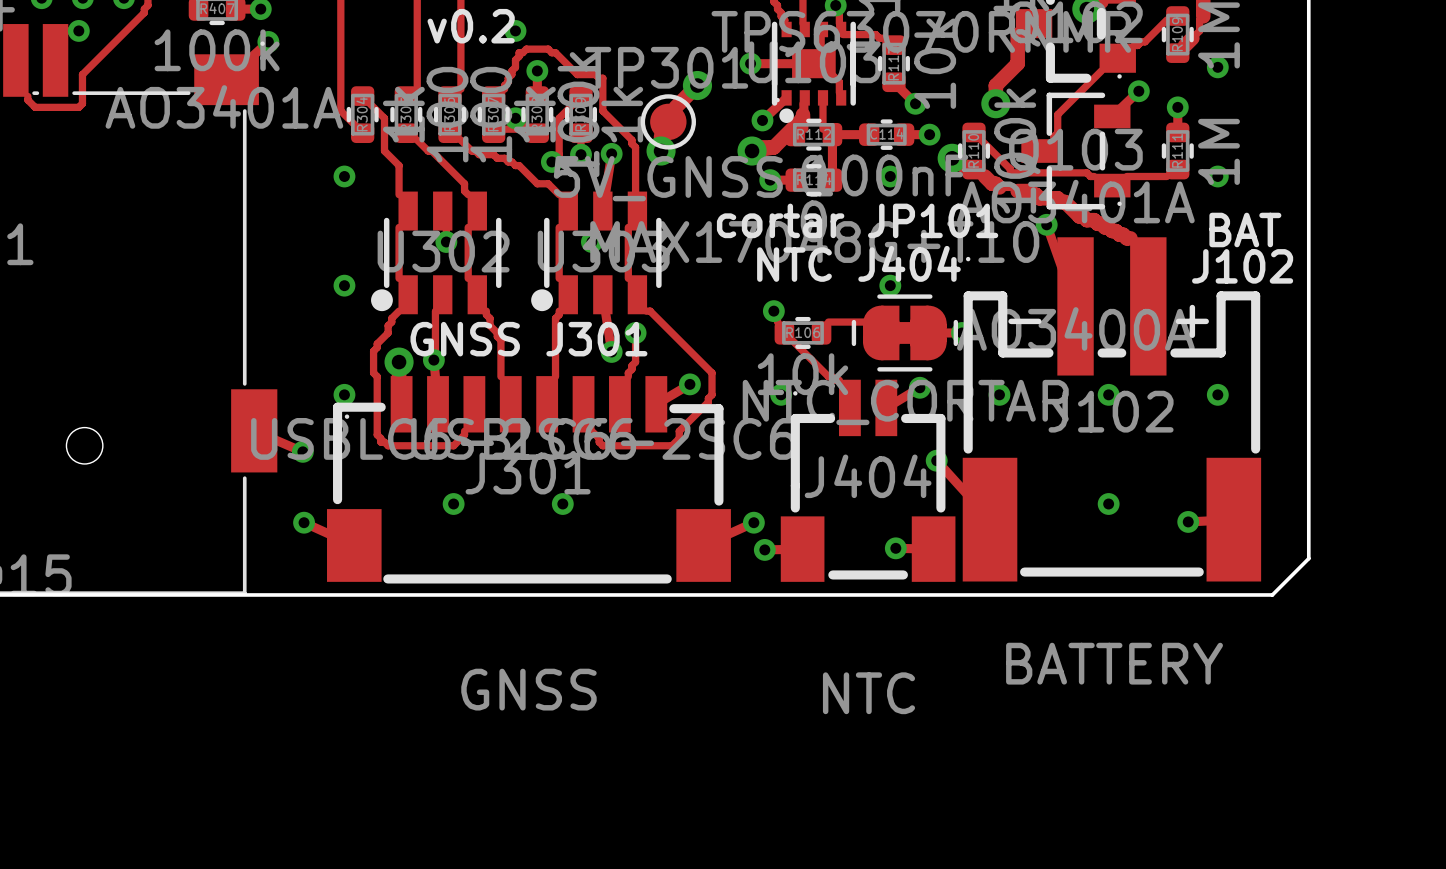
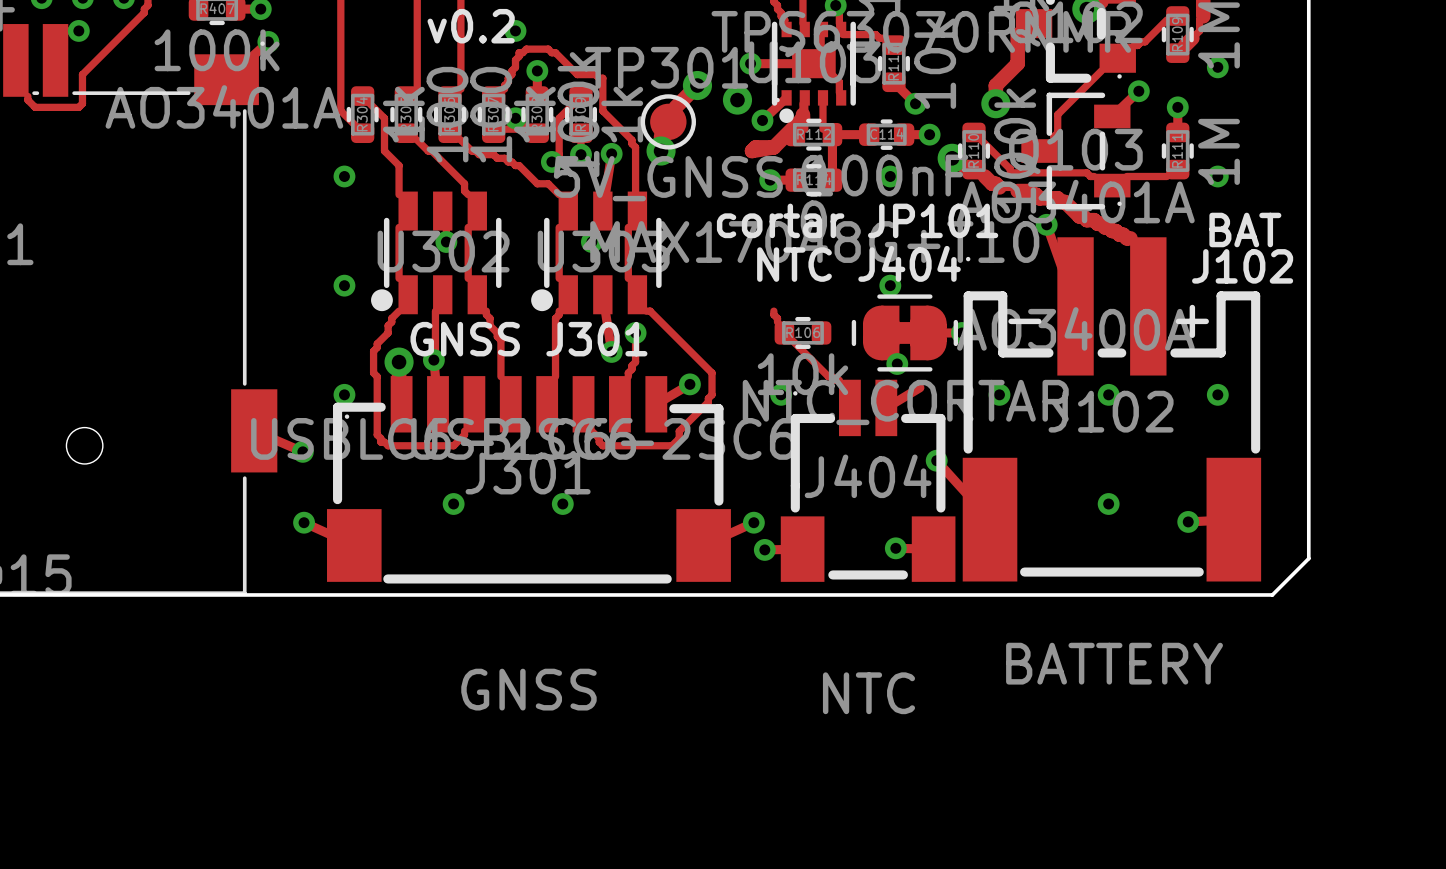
via position: (752, 151) -> (737, 100)
via: (773, 311) -> none
track: (828, 322) (864, 322) -> none
via position: (919, 387) -> (897, 363)

